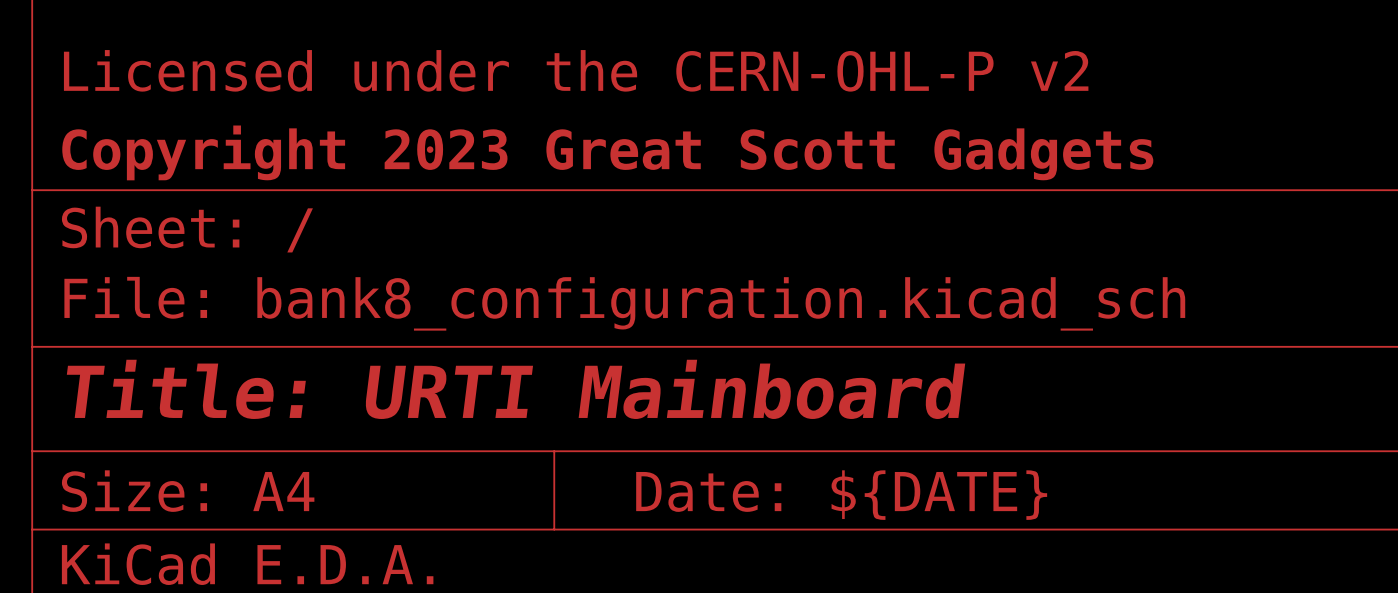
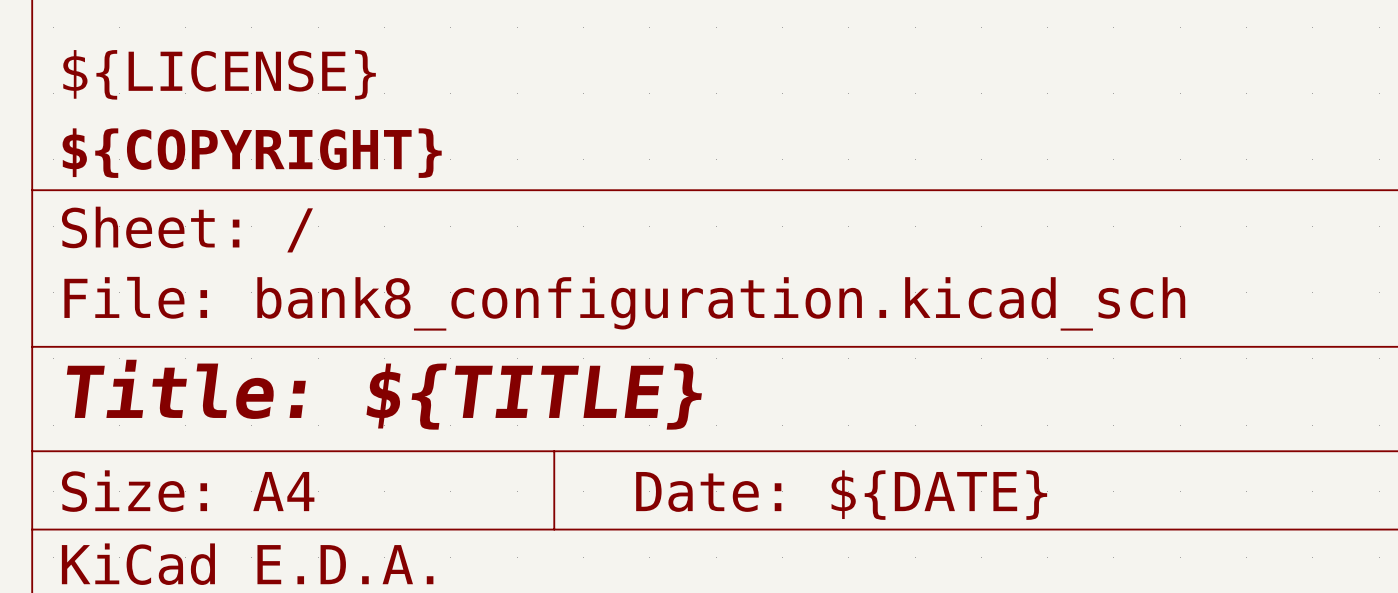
title block: Licensed under the CERN-OHL-P v2 (576, 70) -> ${LICENSE} (219, 74)
title block: Copyright 2023 Great Scott Gadgets (607, 152) -> ${COPYRIGHT} (252, 153)
title block: Title: URTI Mainboard (516, 389) -> Title: ${TITLE} (384, 394)

